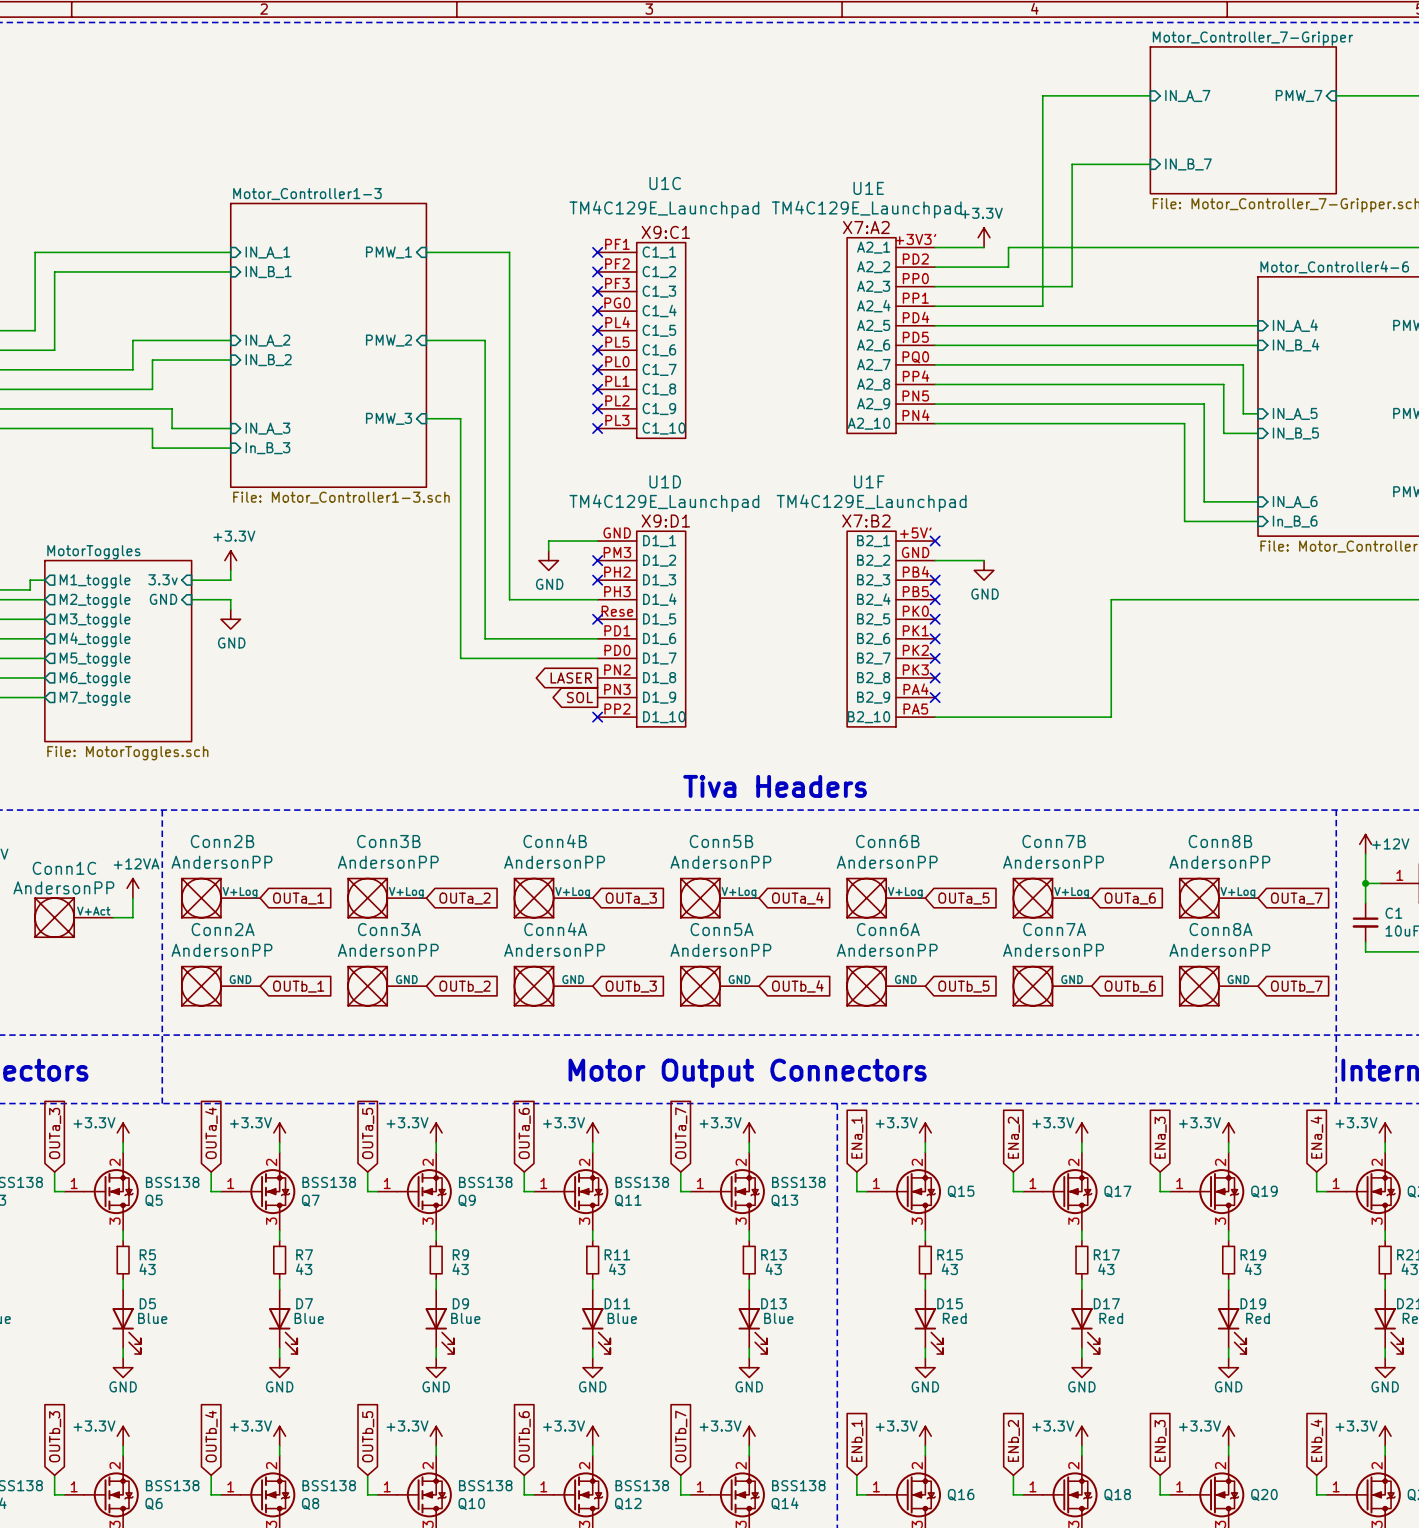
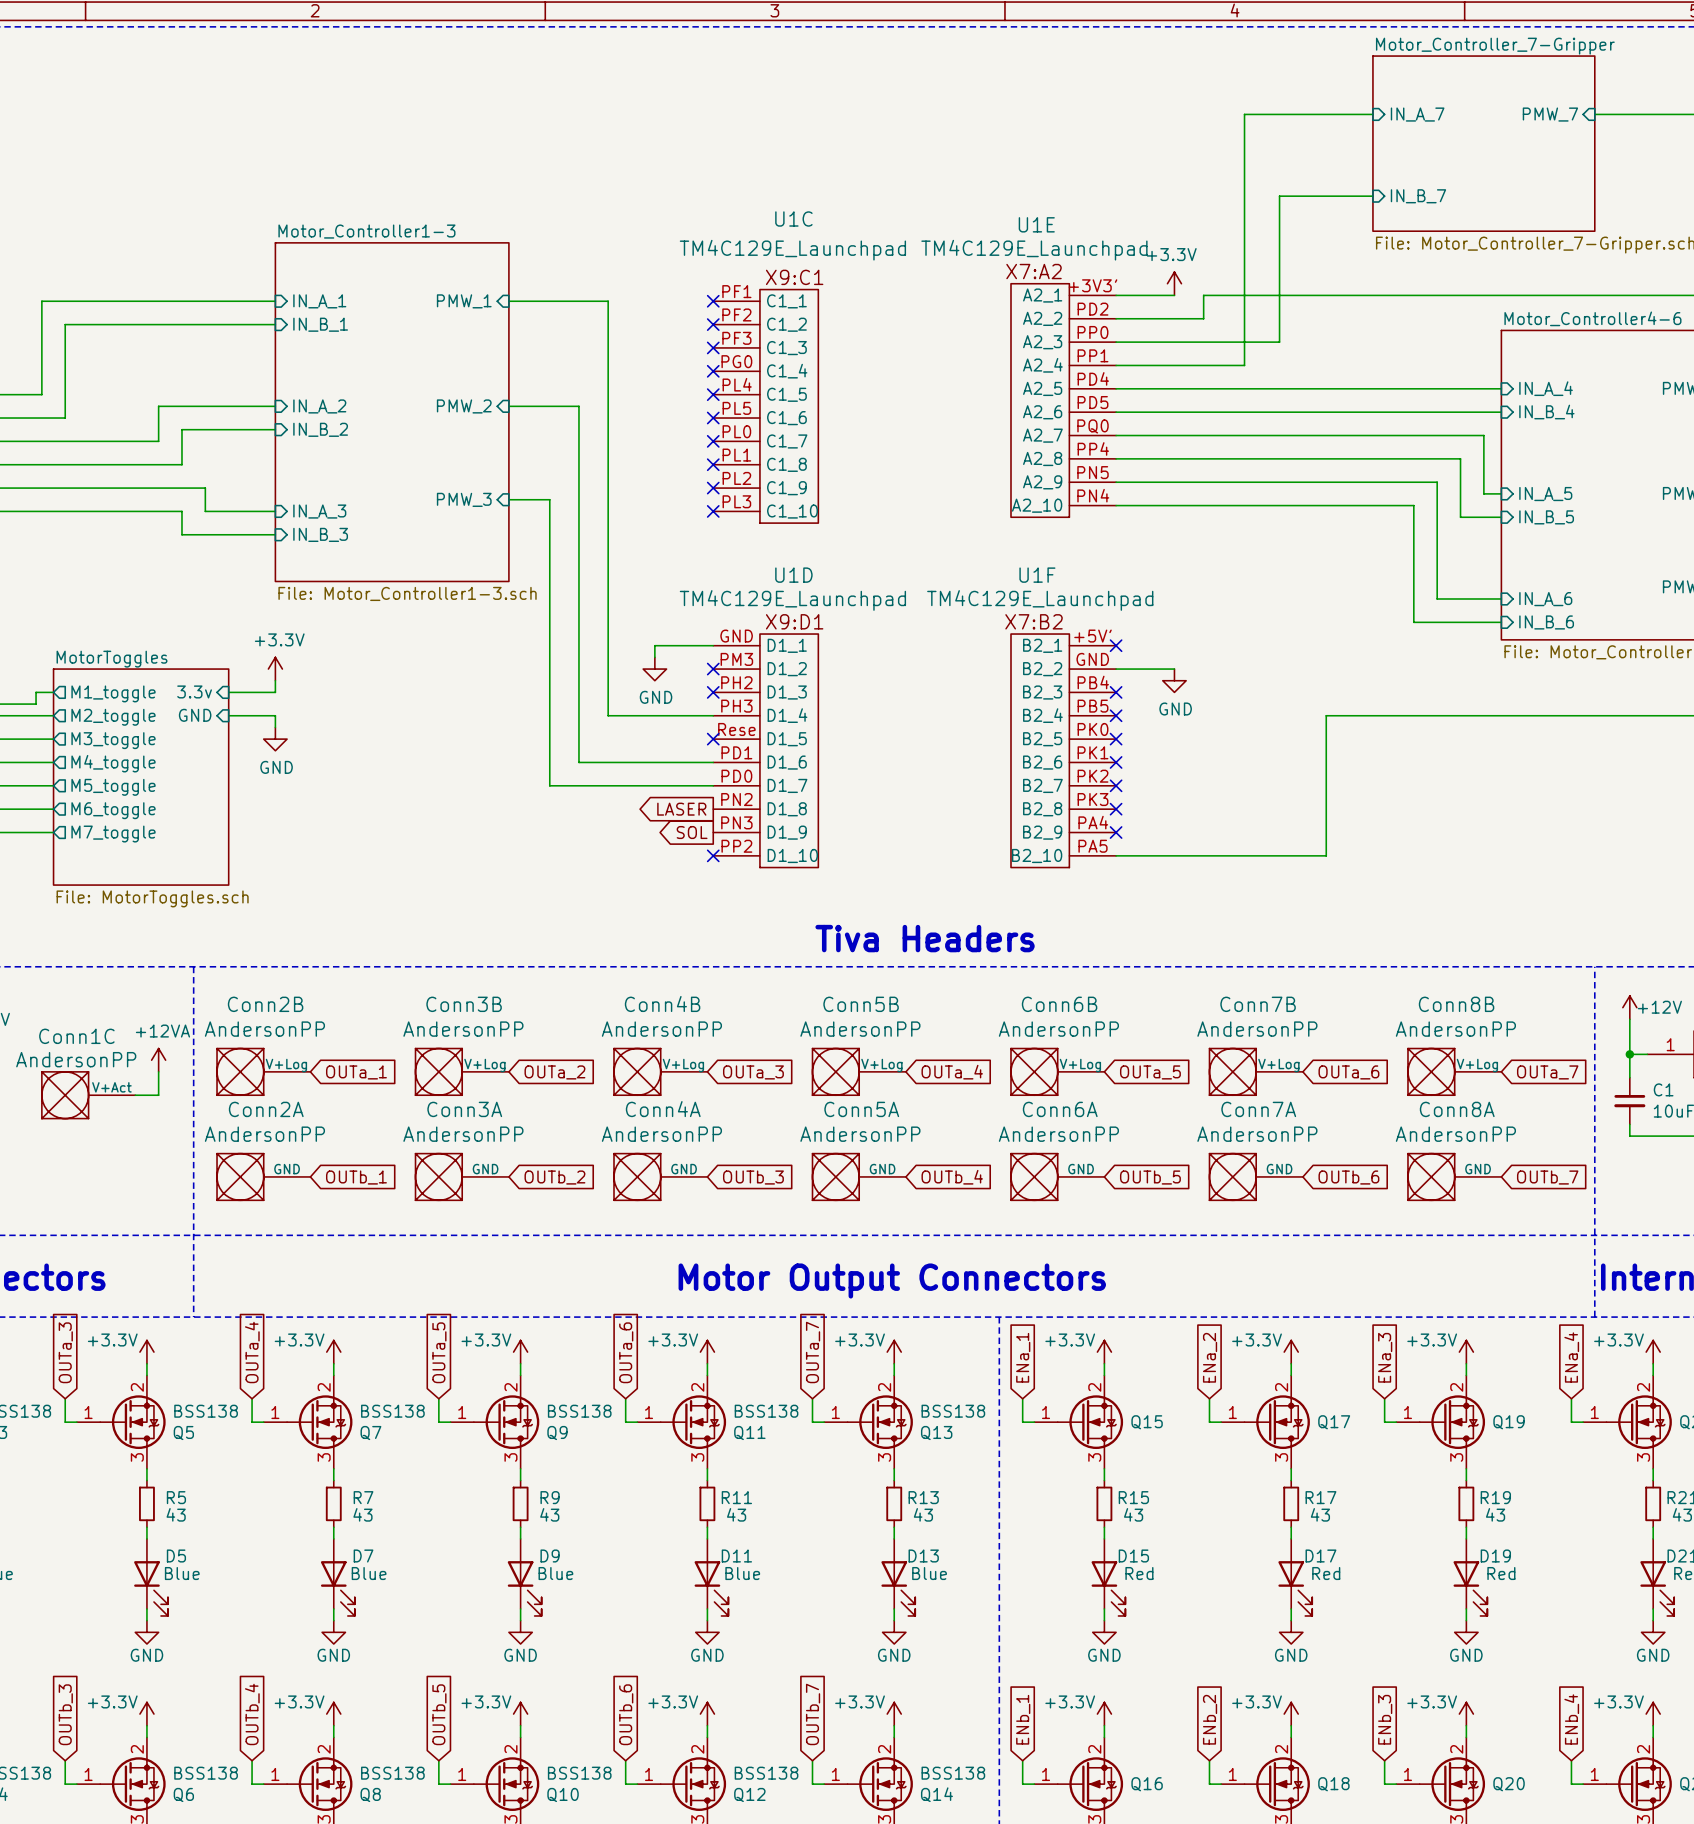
sheet pin: In_B_3 (267, 448) -> IN_B_3 (320, 534)
sheet pin: In_B_6 (1295, 521) -> IN_B_6 (1546, 622)

